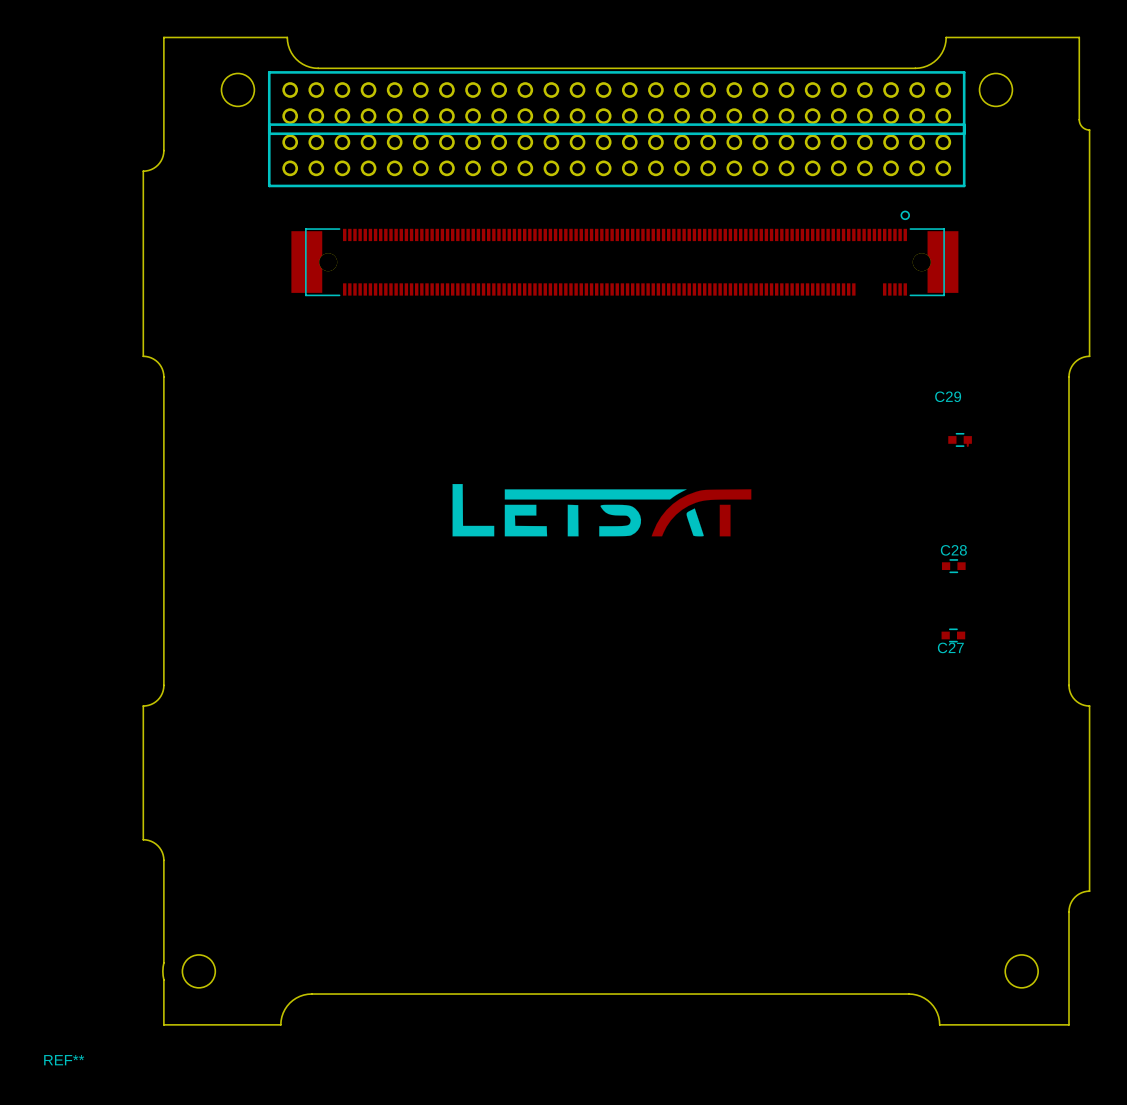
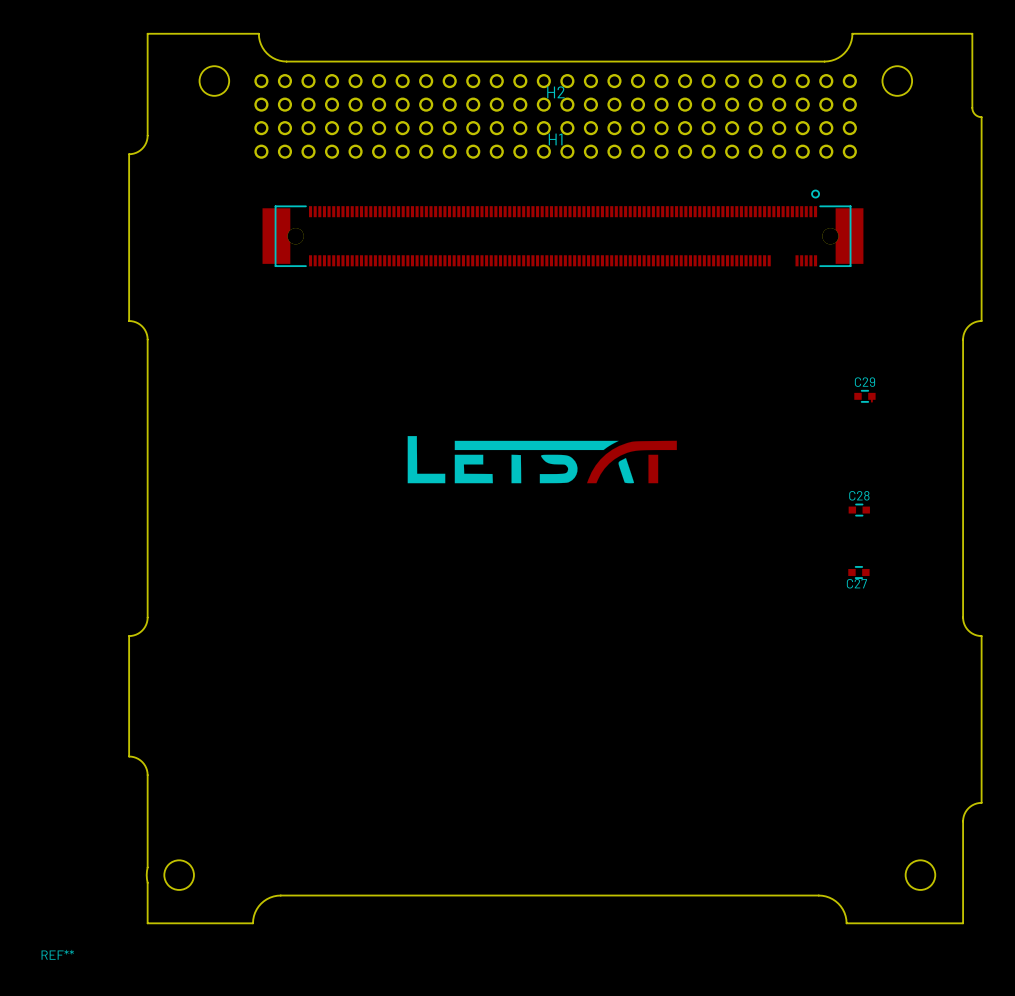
part: (616, 103) -> none
H2: none -> (555, 92)
part: (616, 155) -> none
H1: none -> (555, 139)
C29 name position: C29 (948, 396) -> C29 (864, 382)

